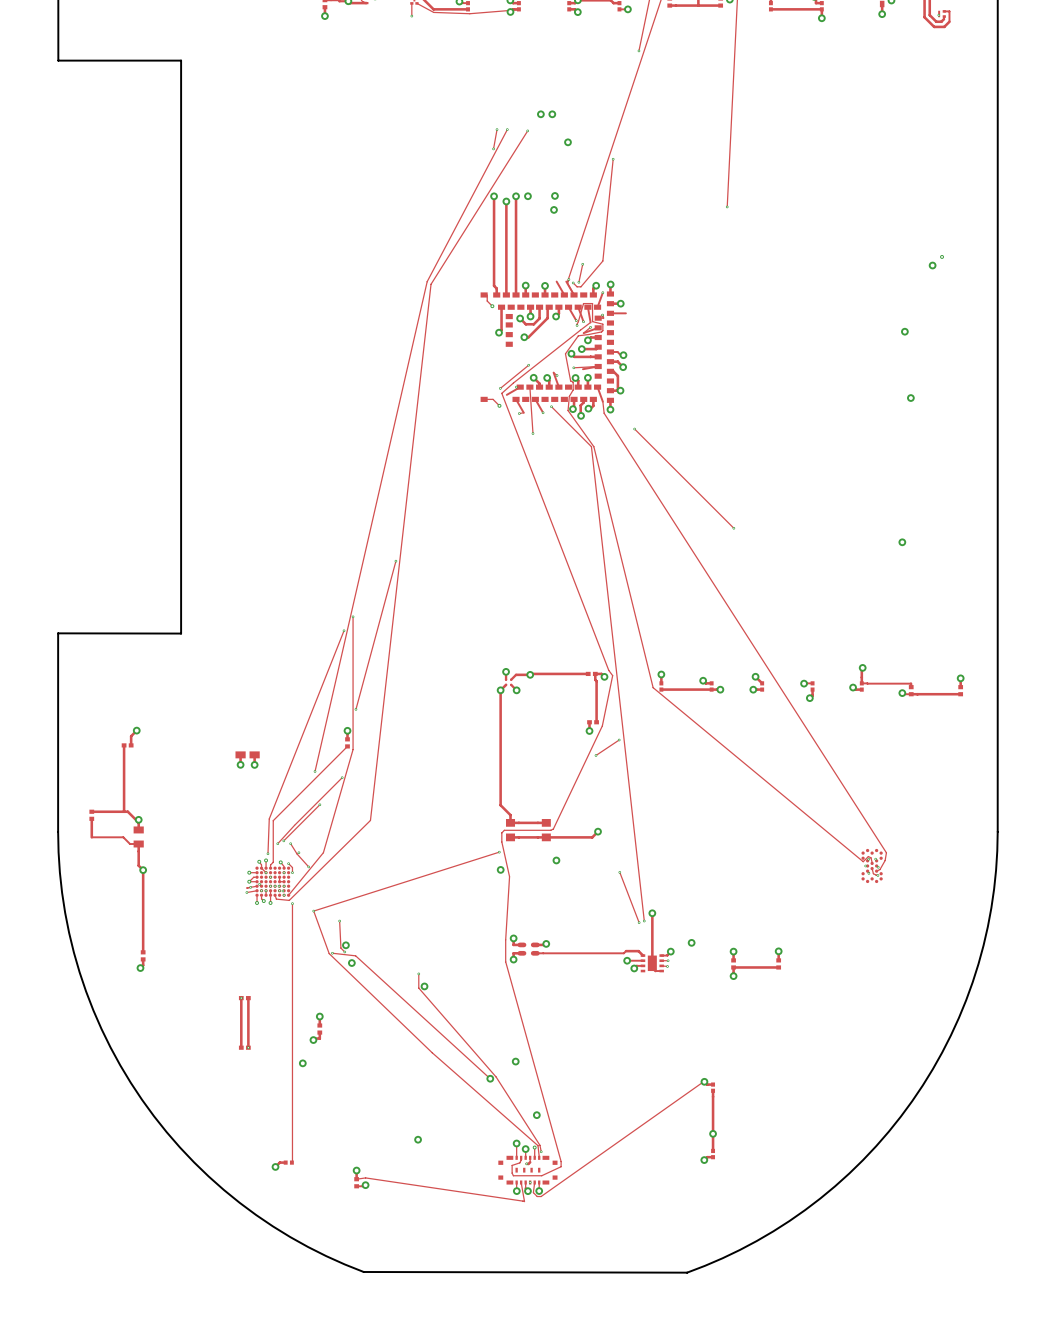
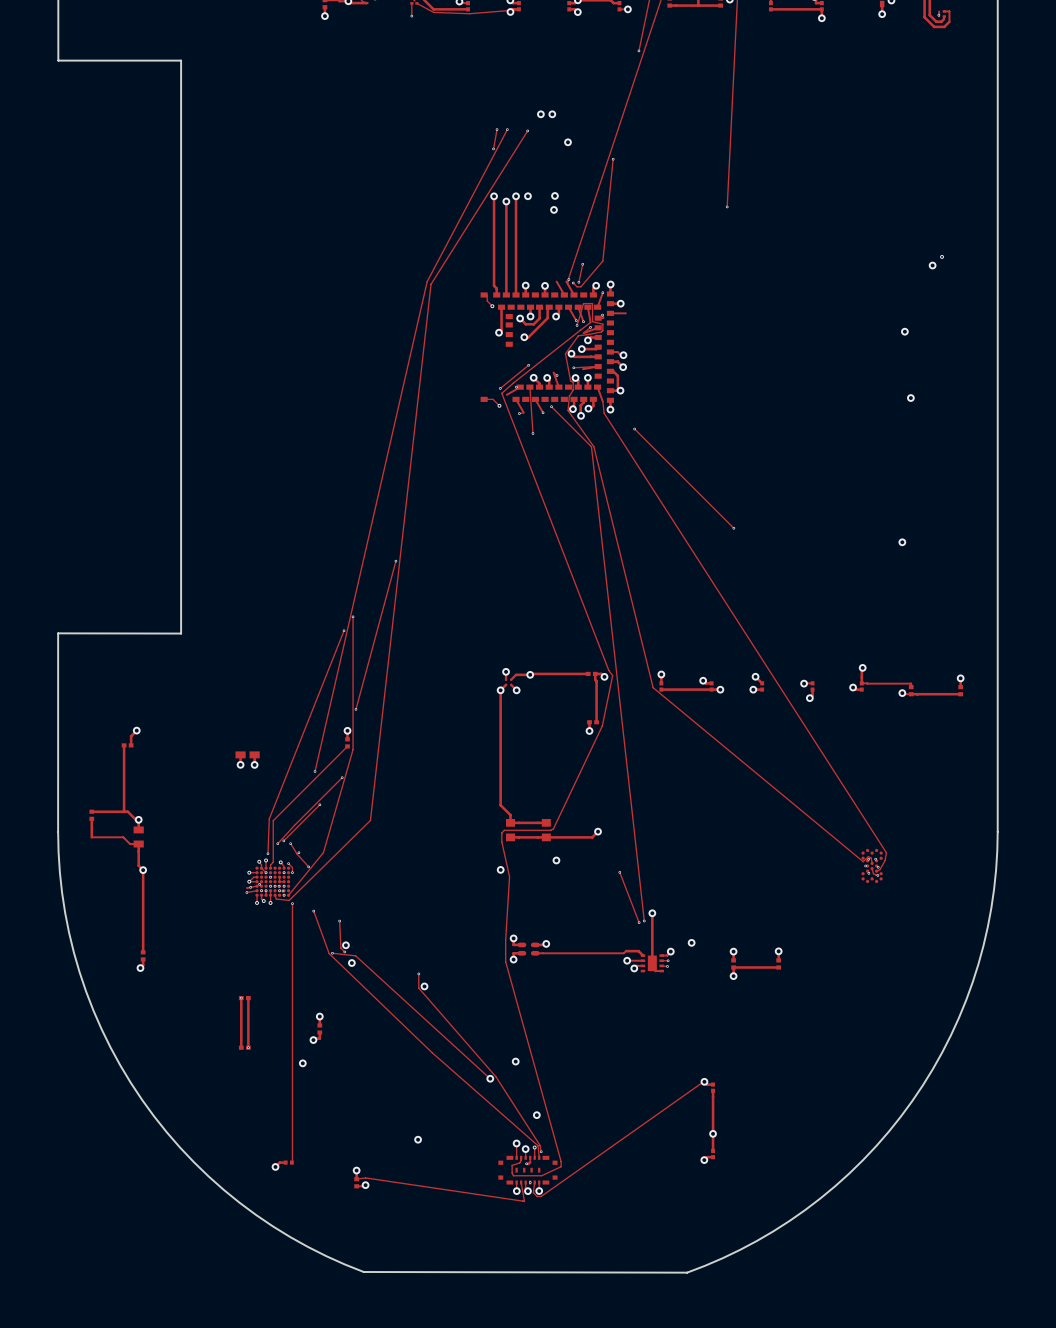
track: (619, 740) (596, 755) -> none
via: (619, 740) -> none
via: (596, 755) -> none
track: (499, 852) (313, 911) -> none
via: (499, 852) -> none

